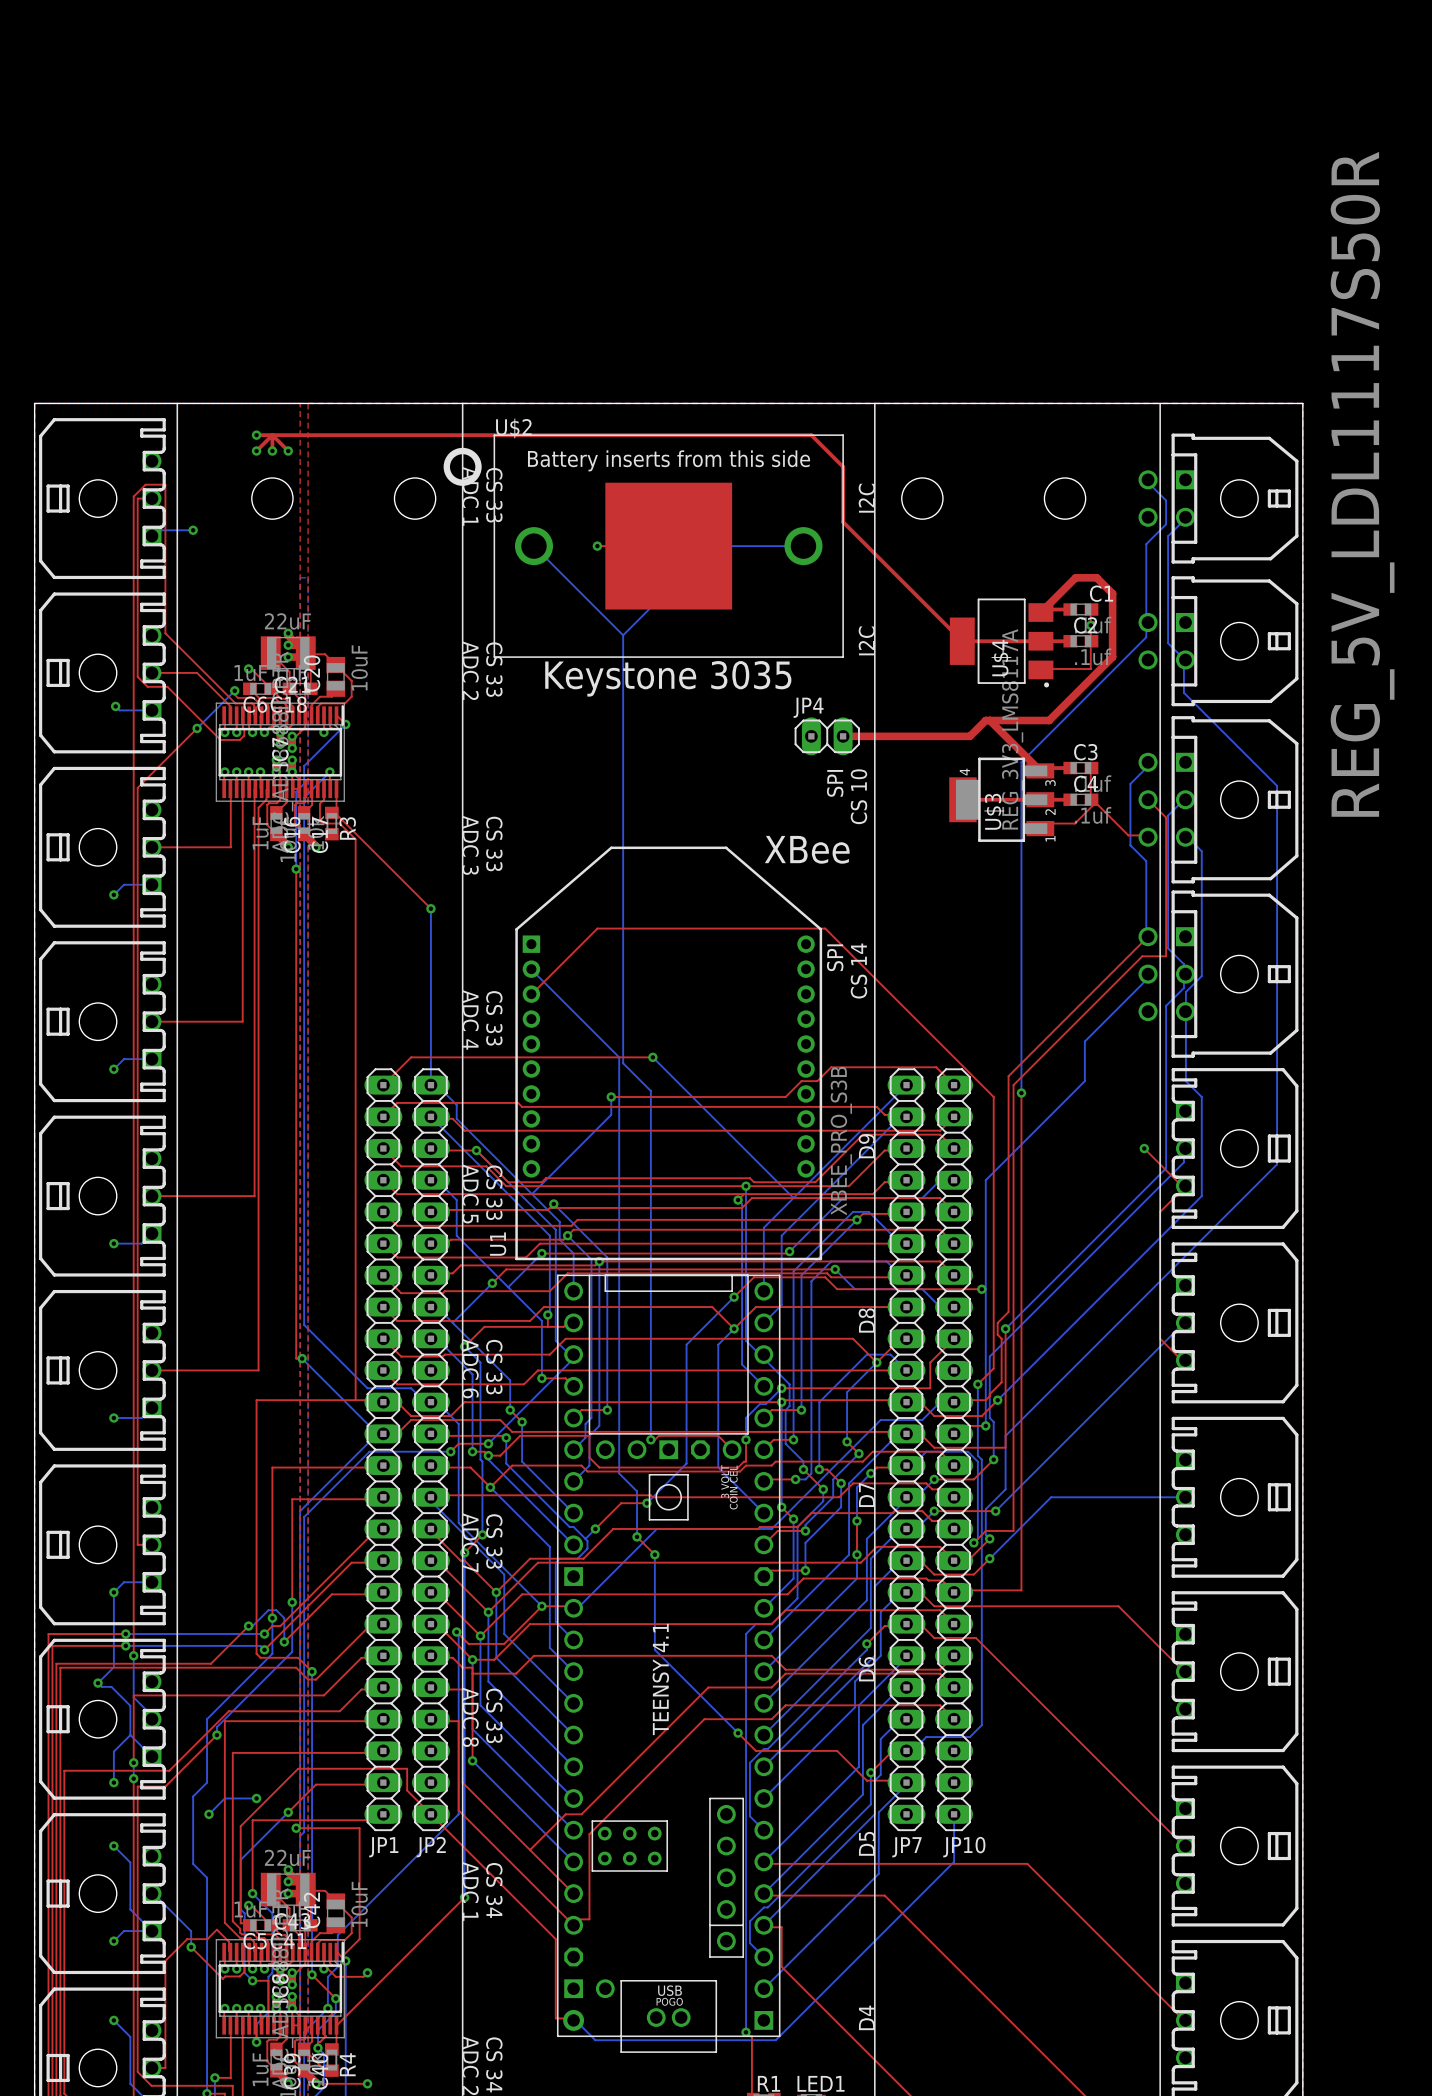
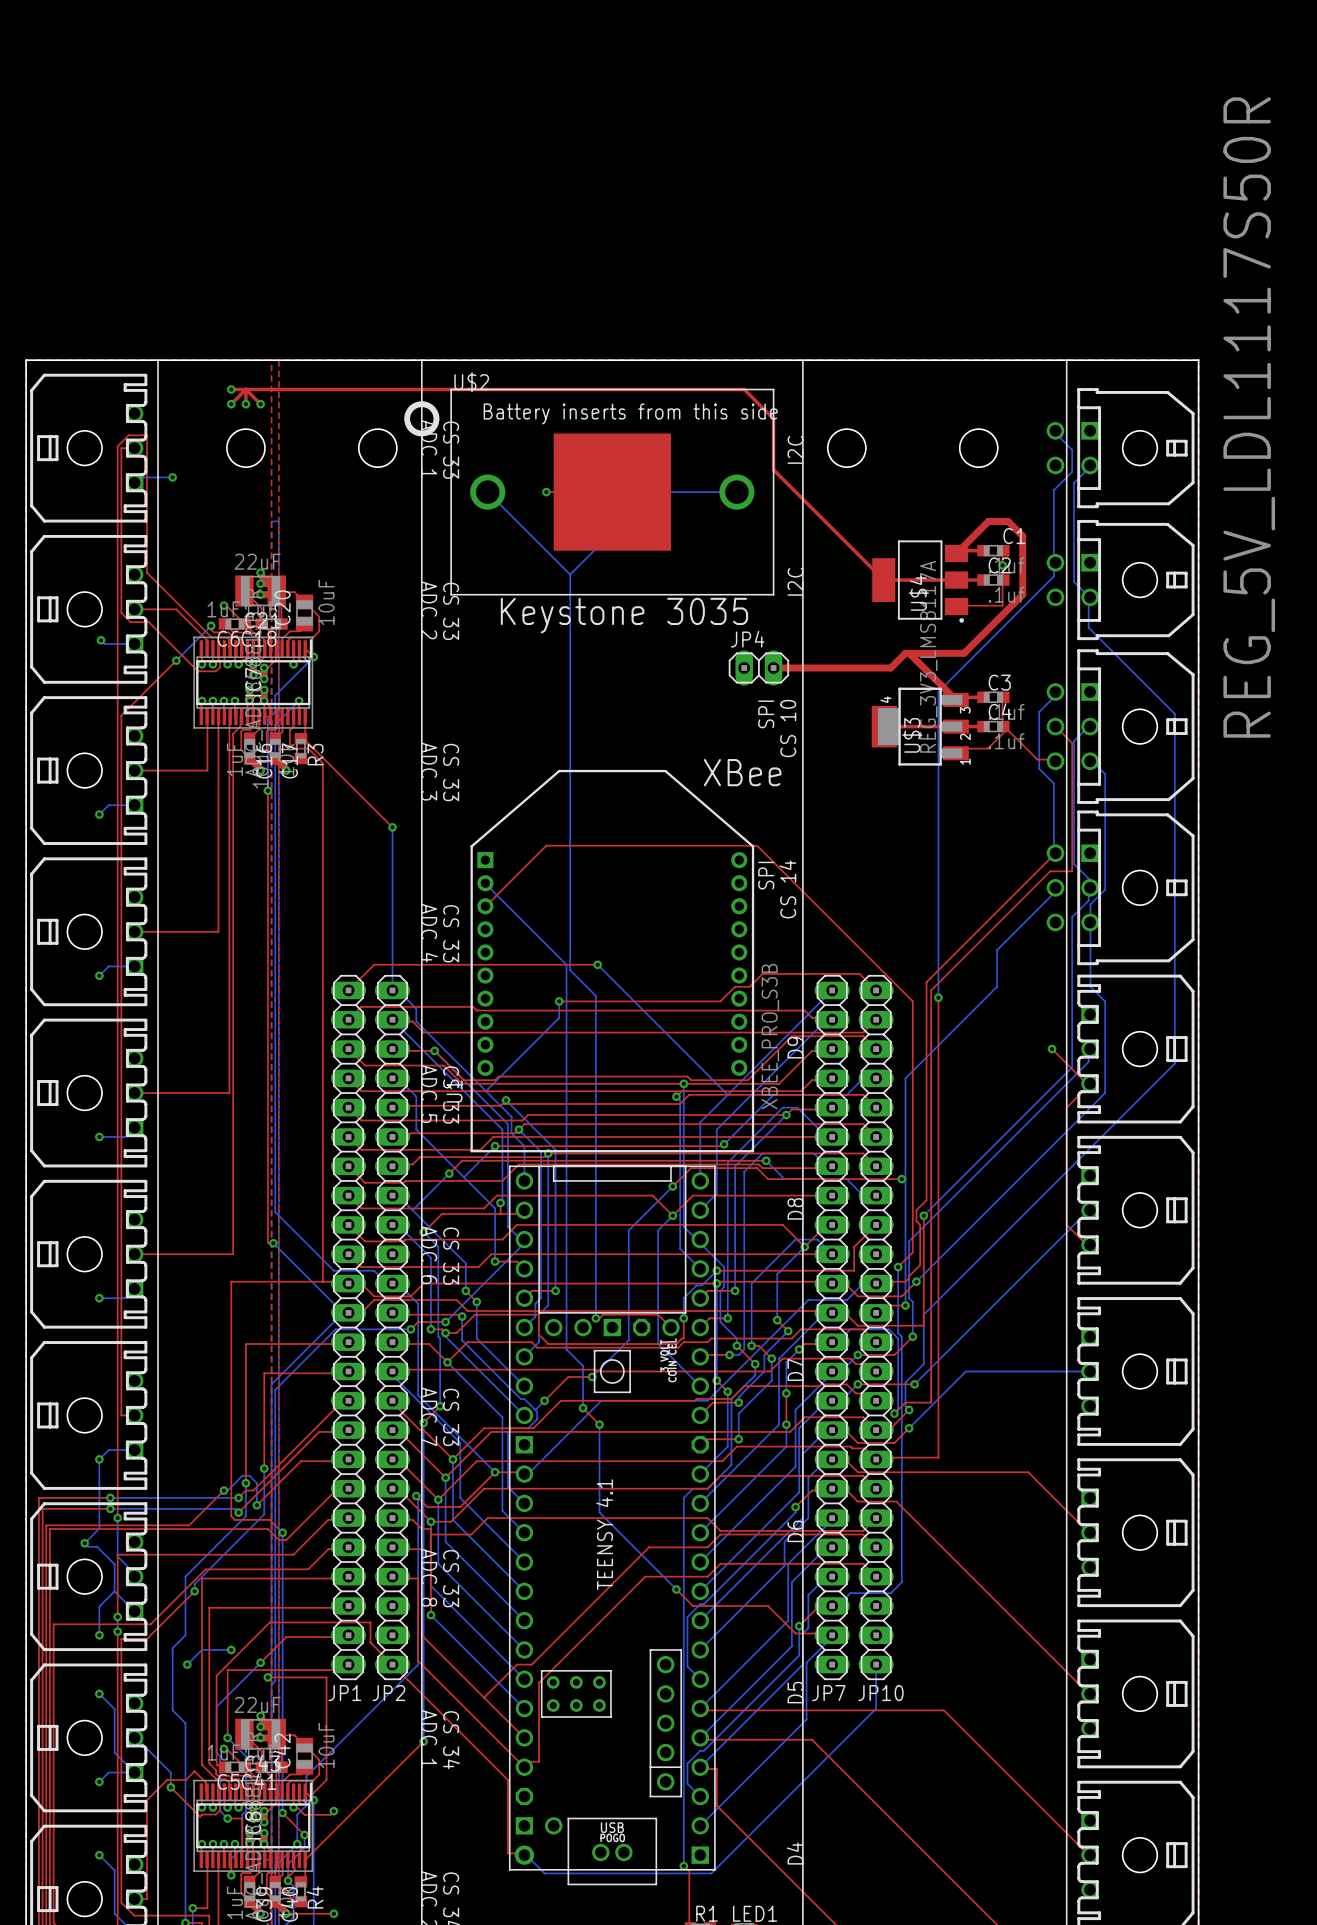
U1 name position: U1 (498, 1244) -> U1 (454, 1091)

